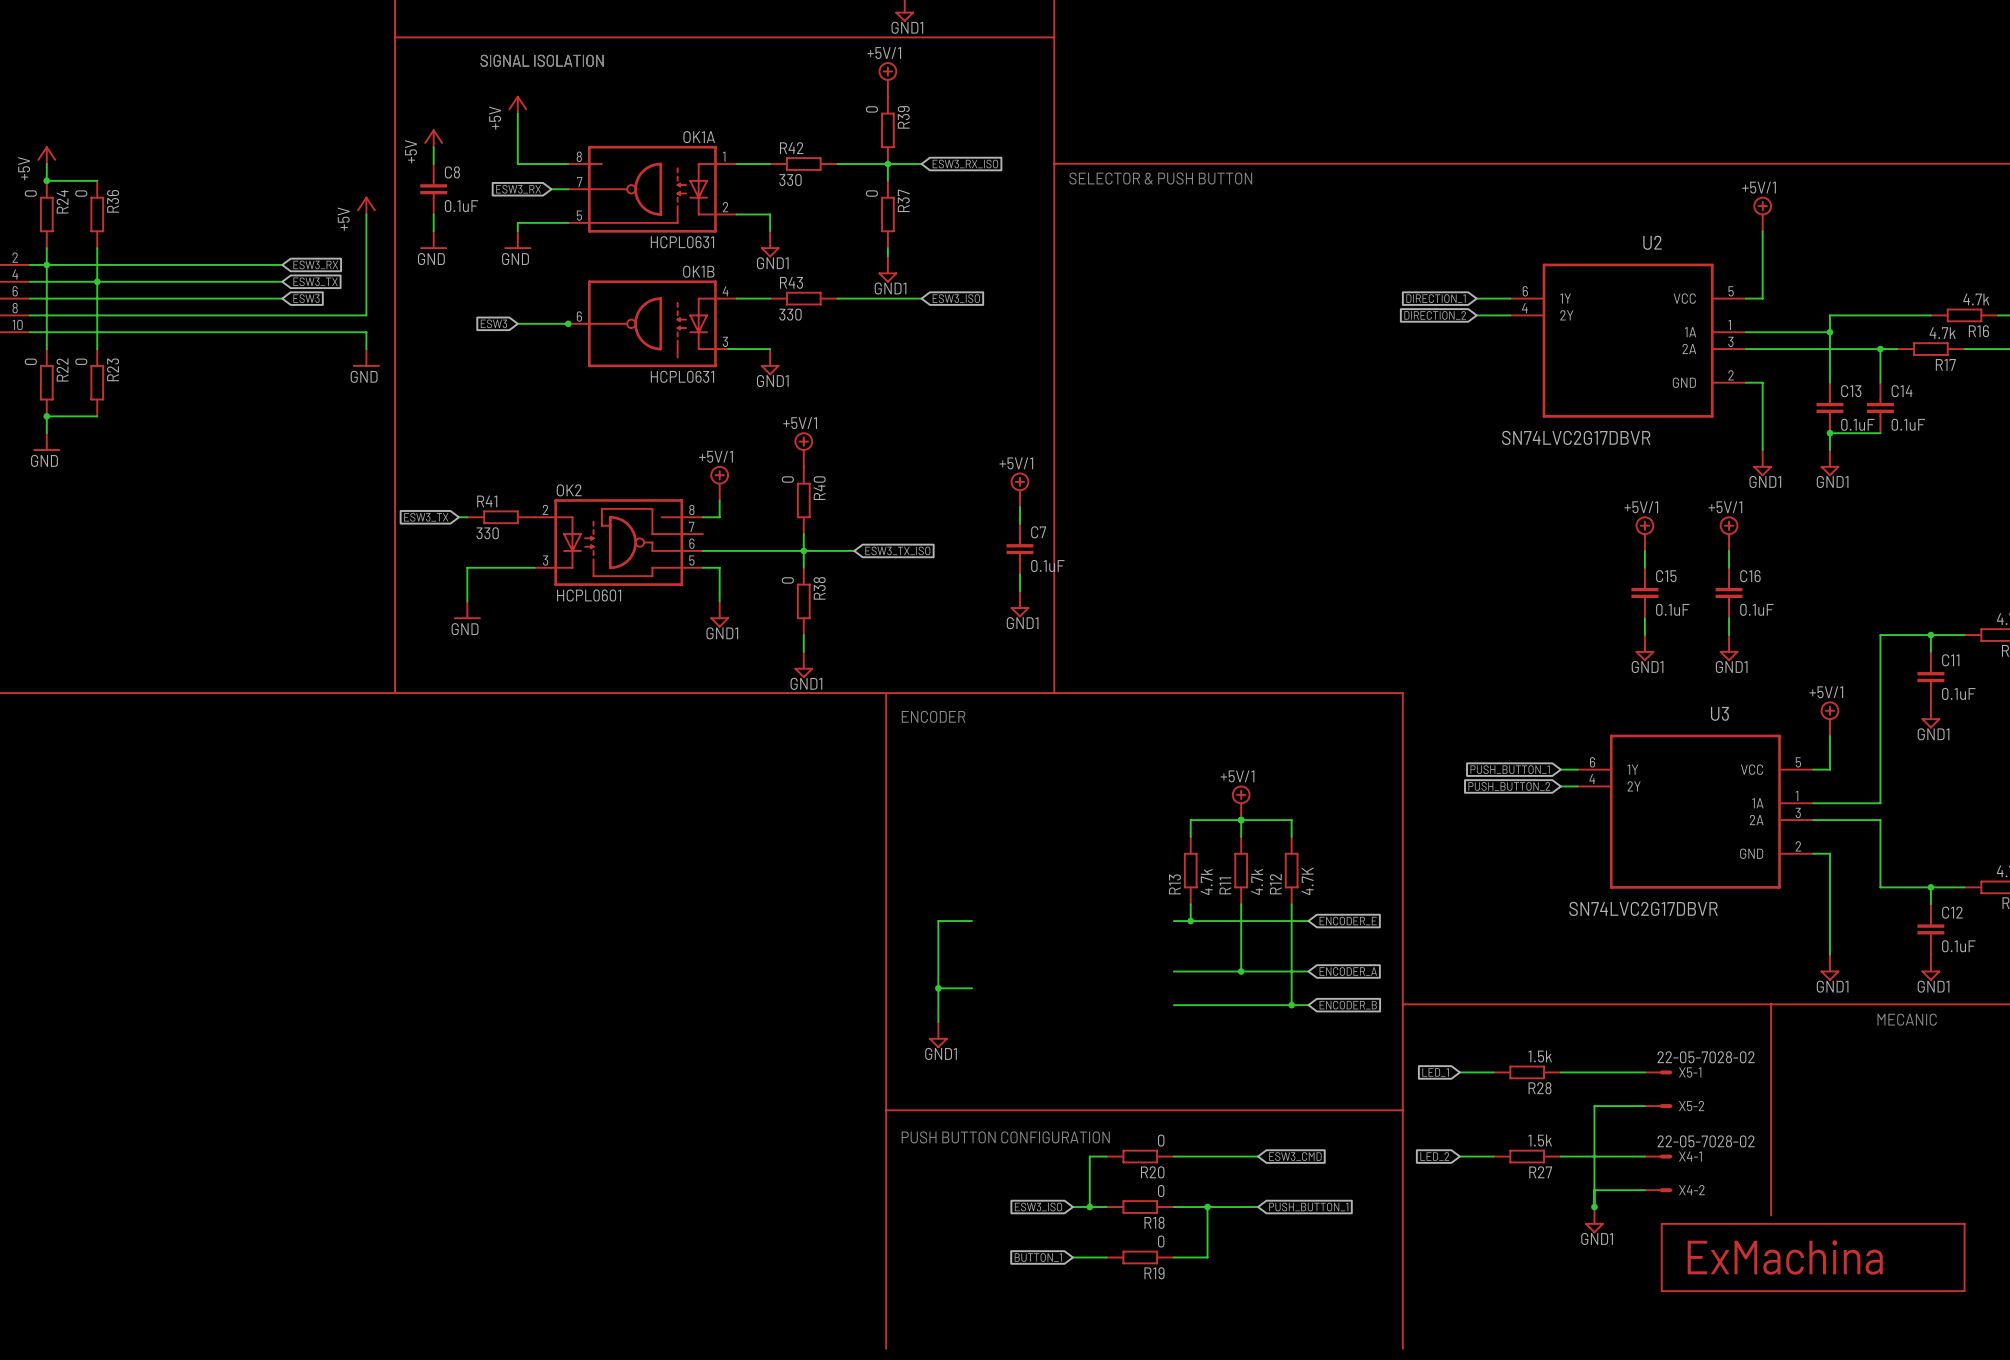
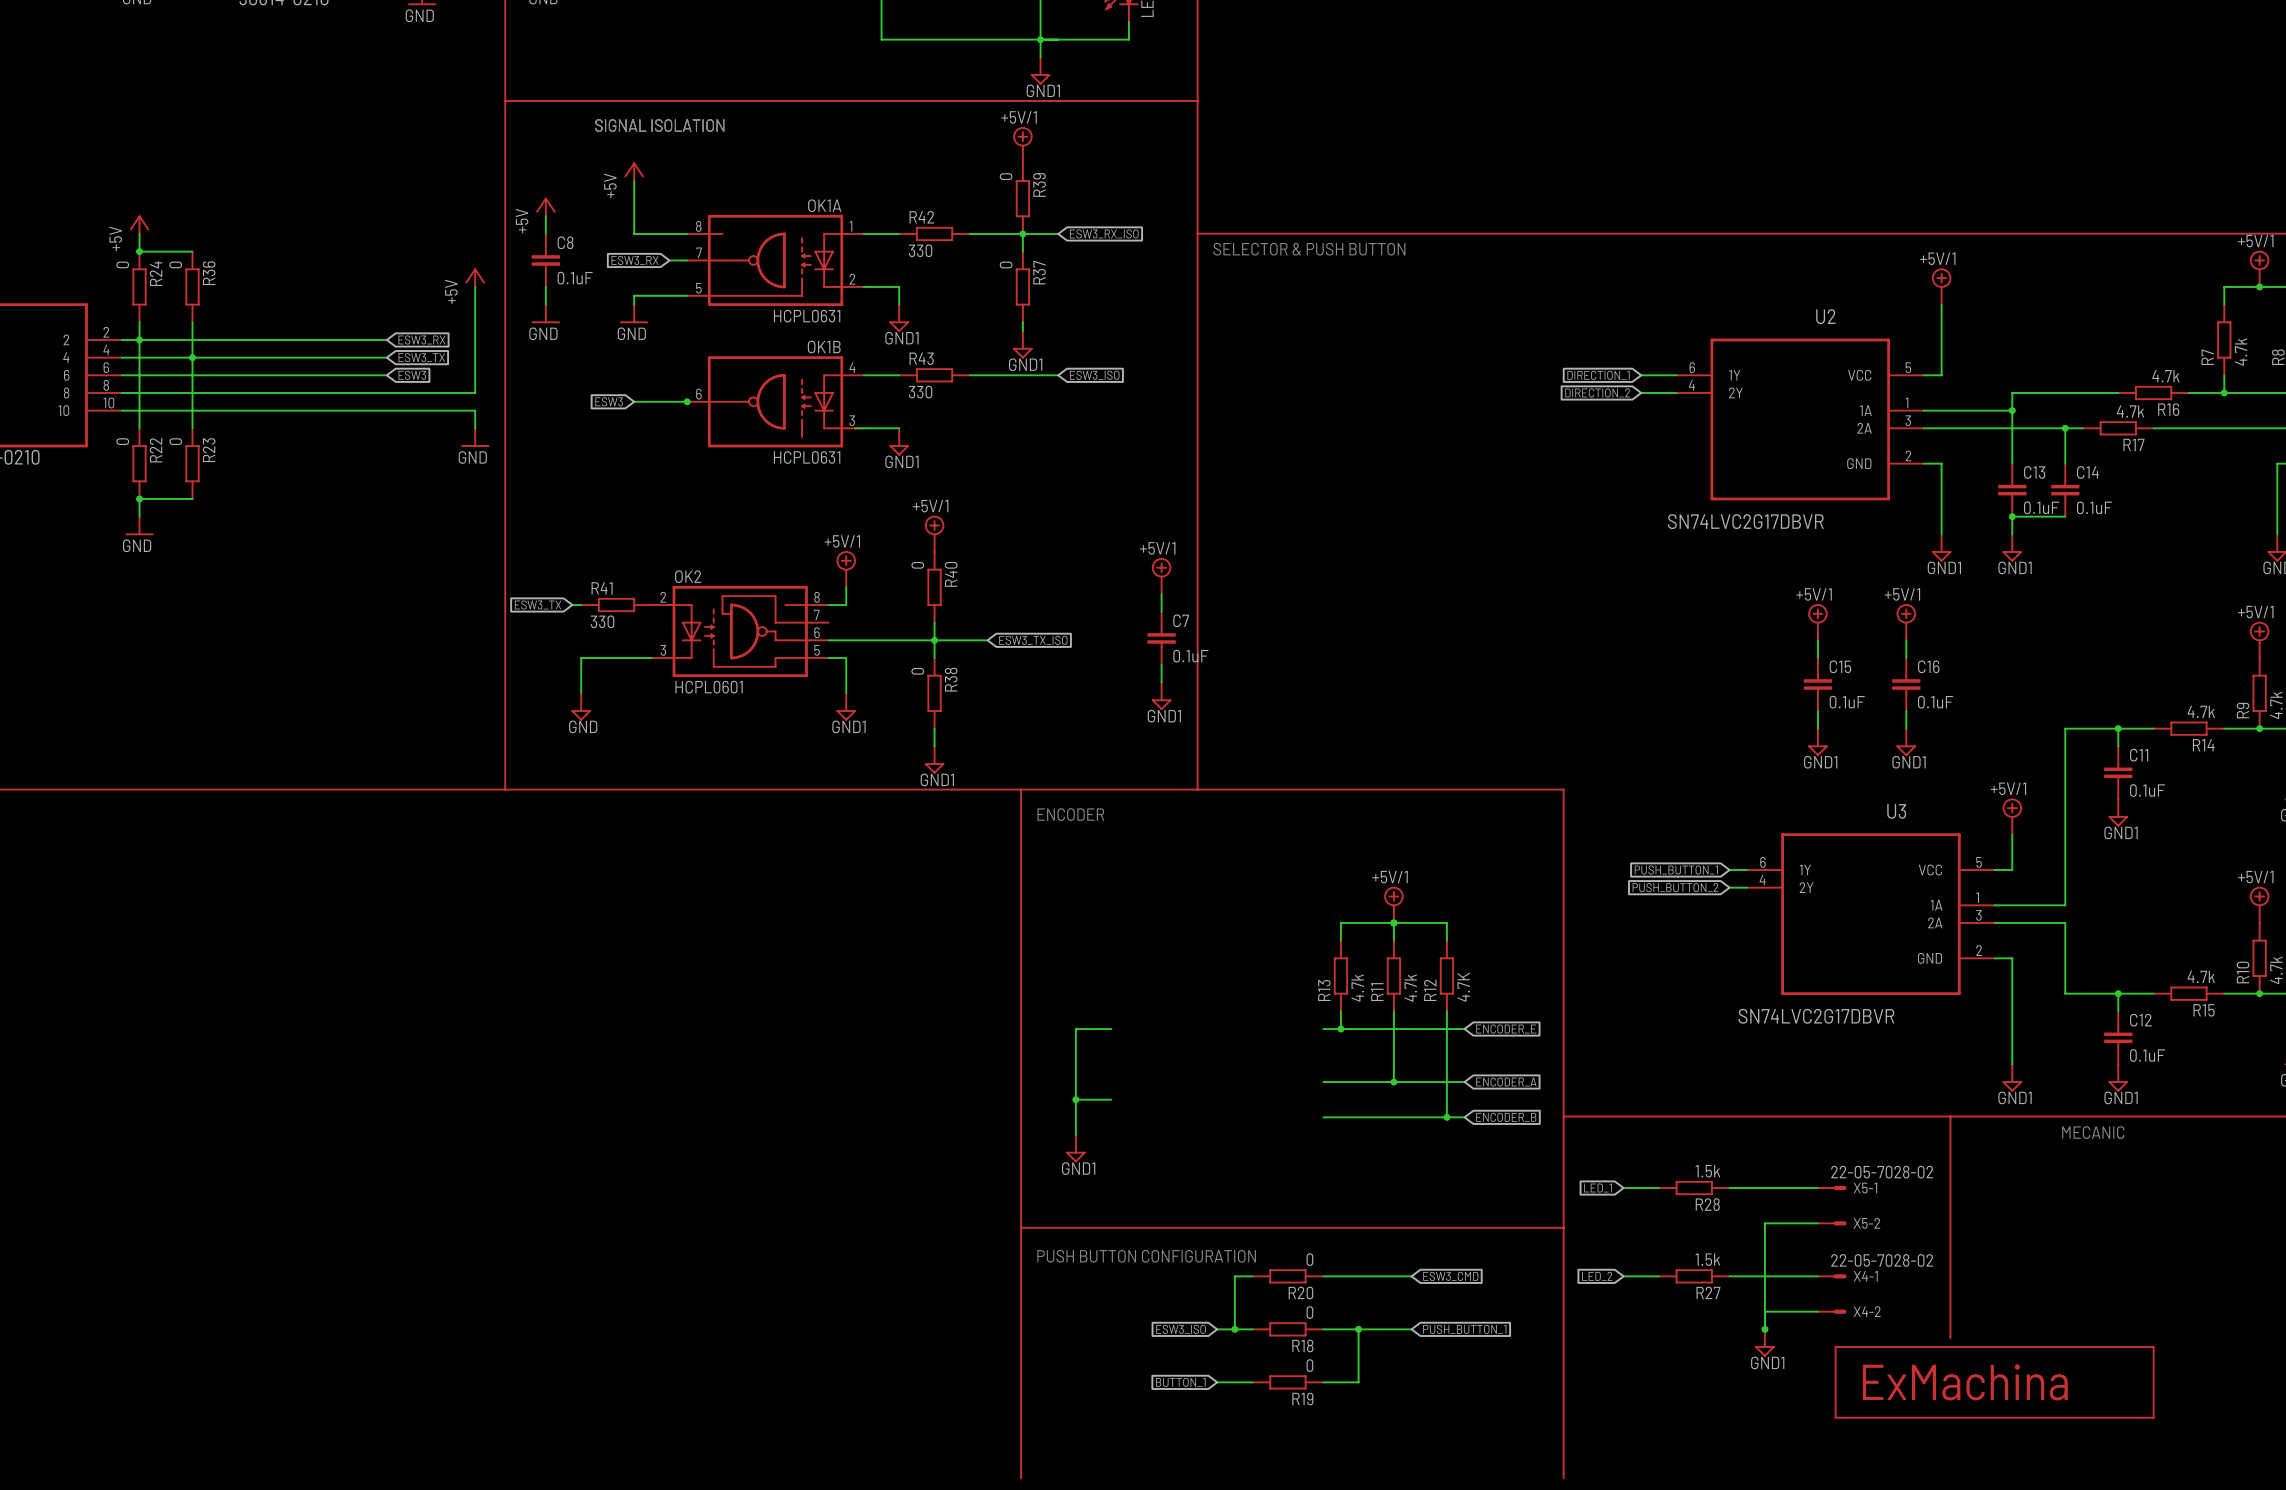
power symbol shape: [453, 601, 481, 620] -> [571, 693, 591, 721]

